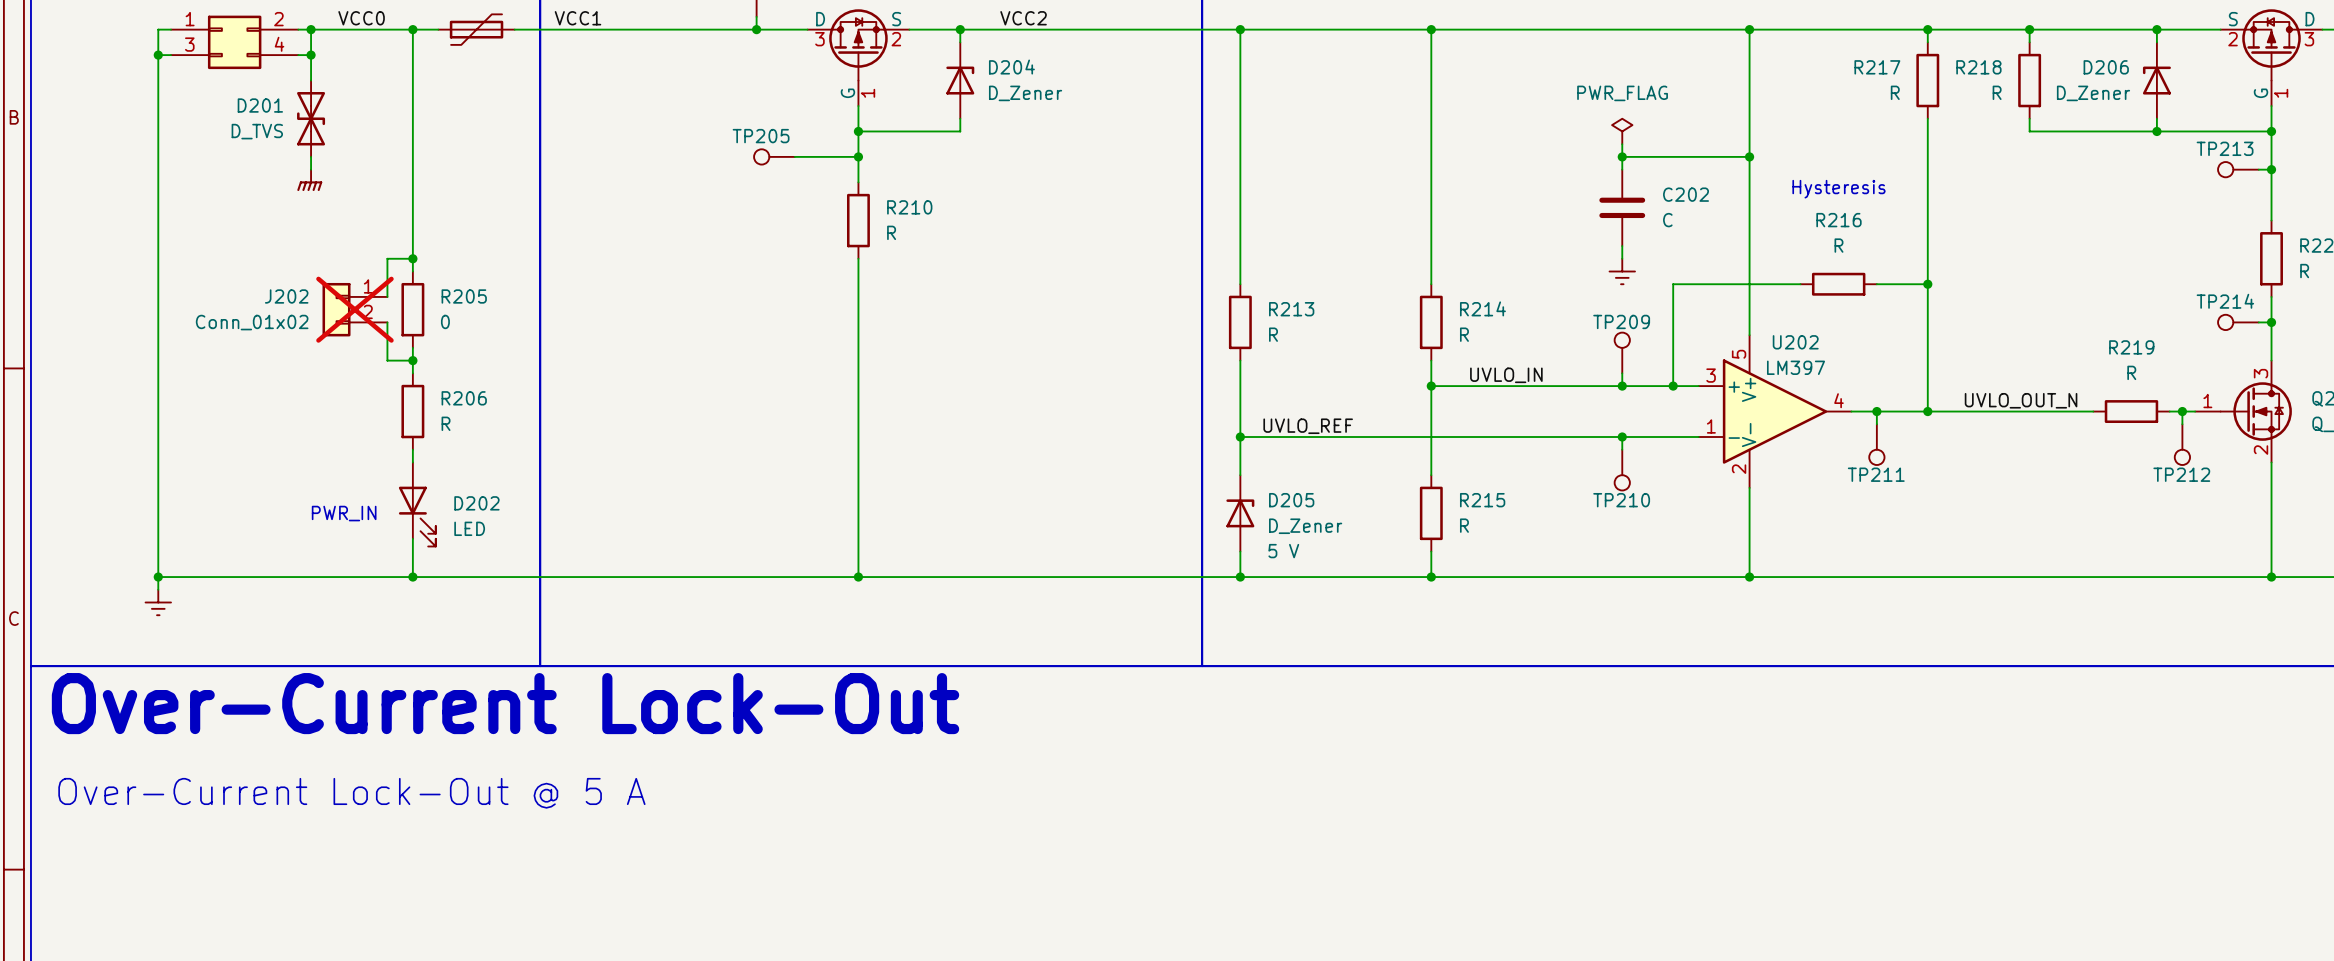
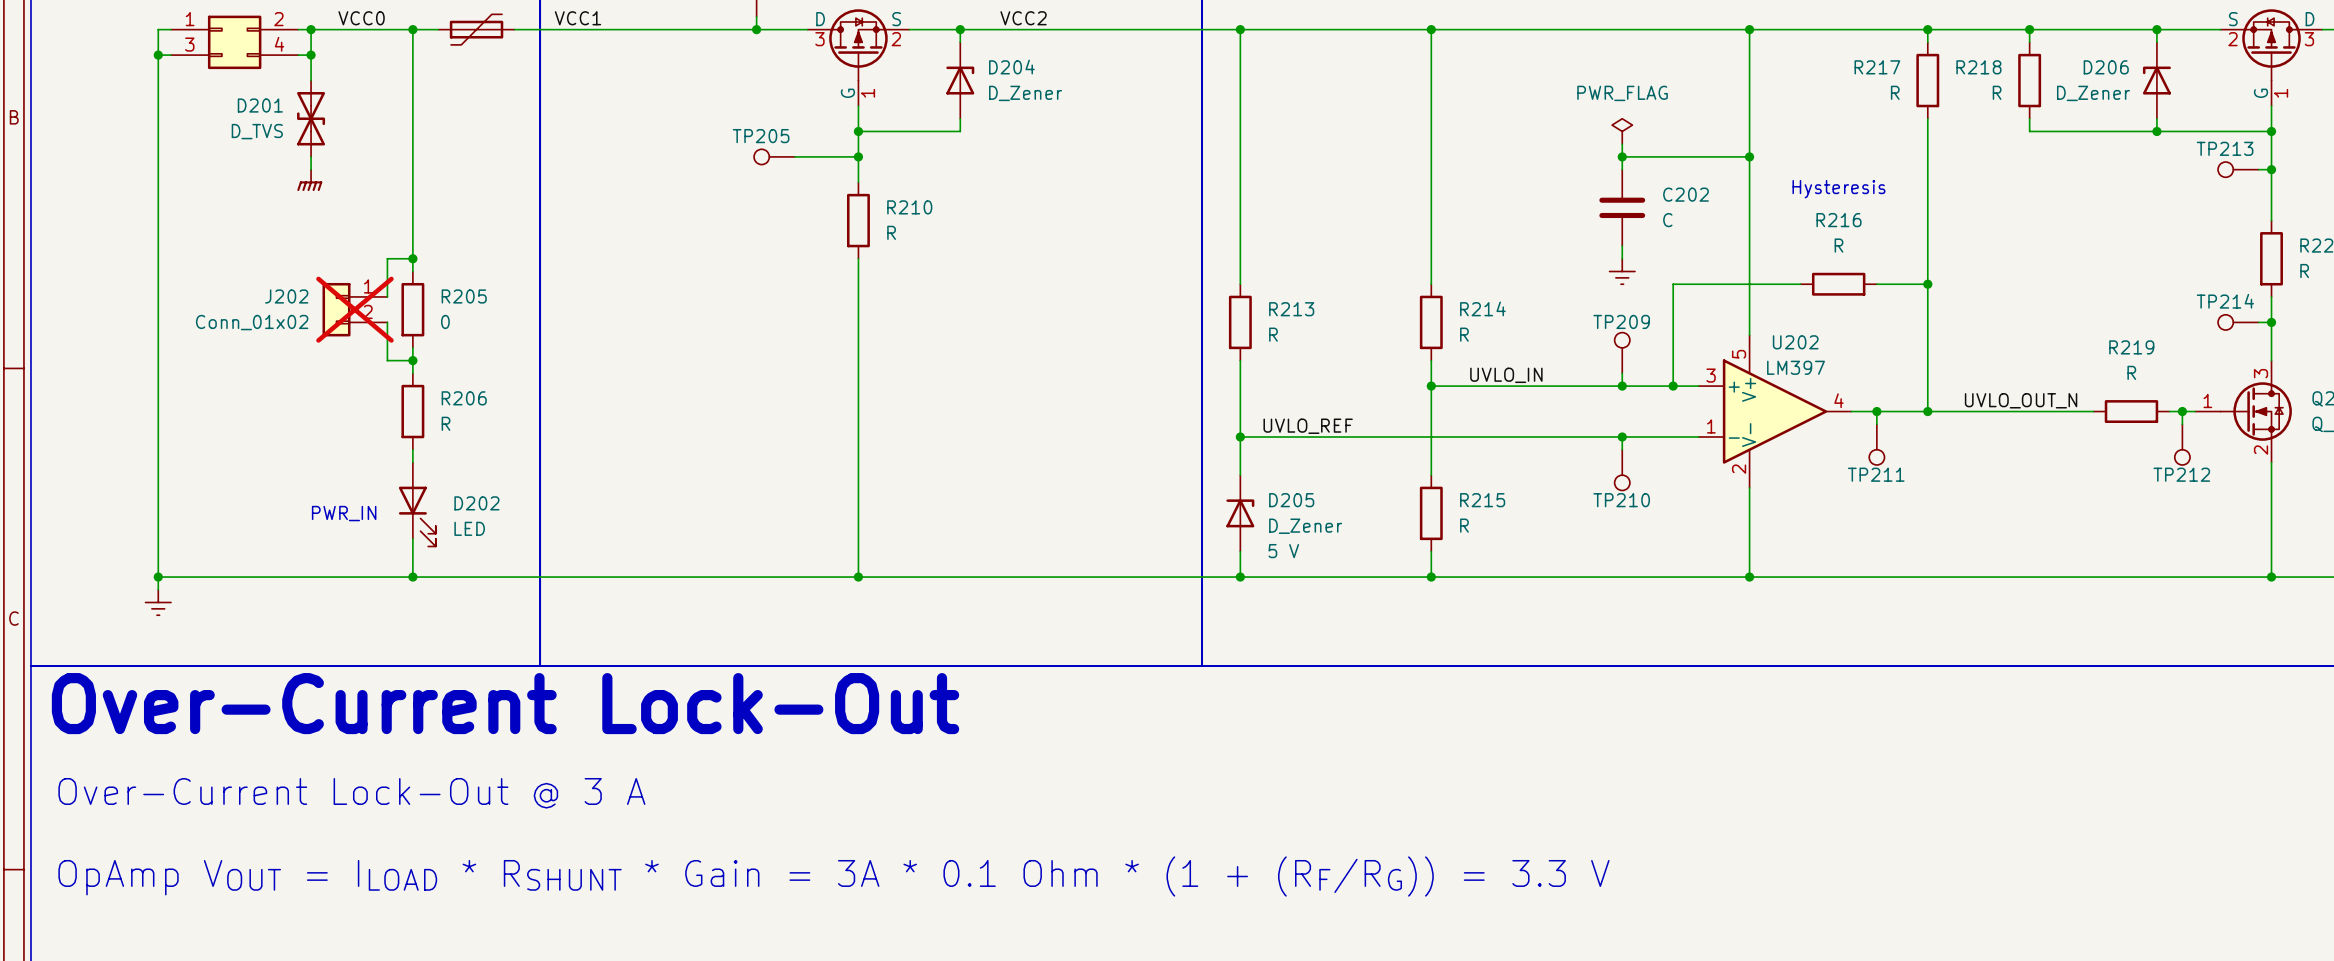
text: Over-Current Lock-Out @ 5 A (351, 793) -> Over-Current Lock-Out @ 3 A (351, 793)
text: none -> OpAmp VOUT = ILOAD * RSHUNT * Gain = 3A * 0.1 Ohm * (1 + (RF/RG)) = 3.3 V (833, 876)

